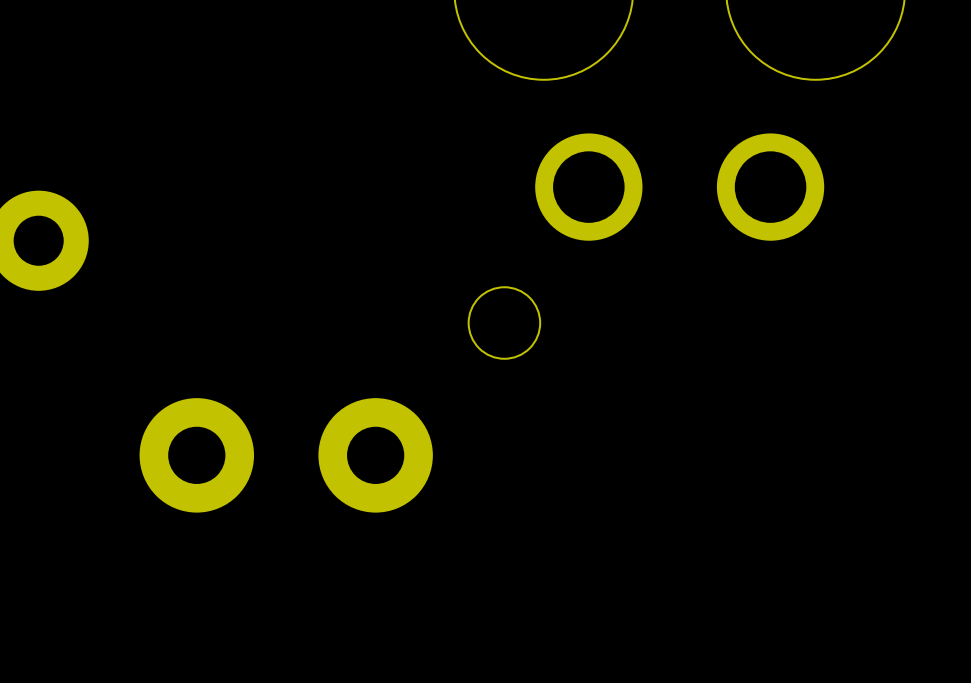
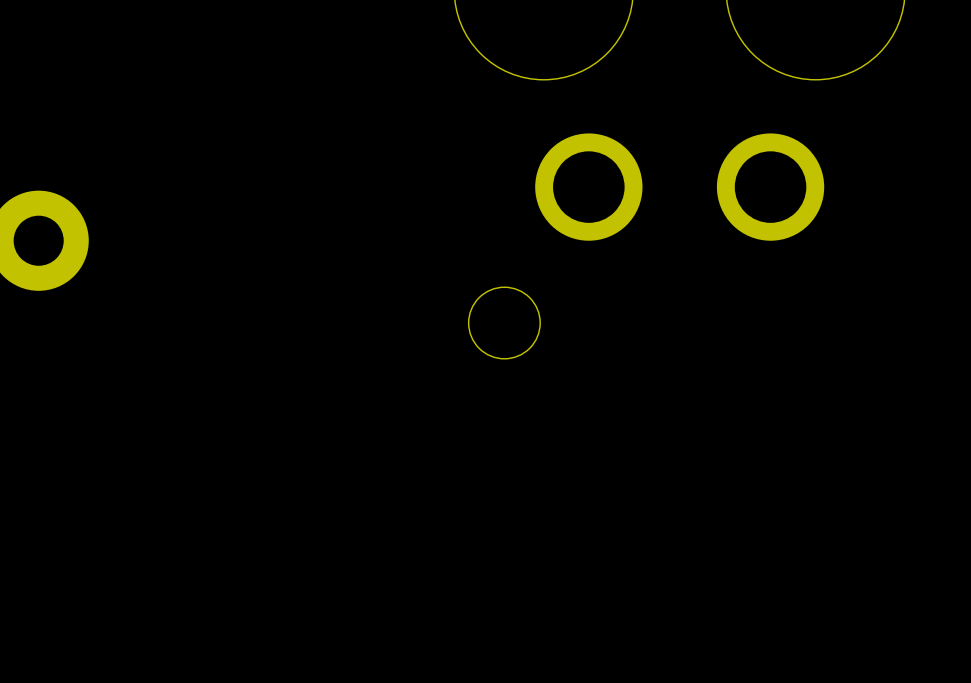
part: (286, 455) -> none

